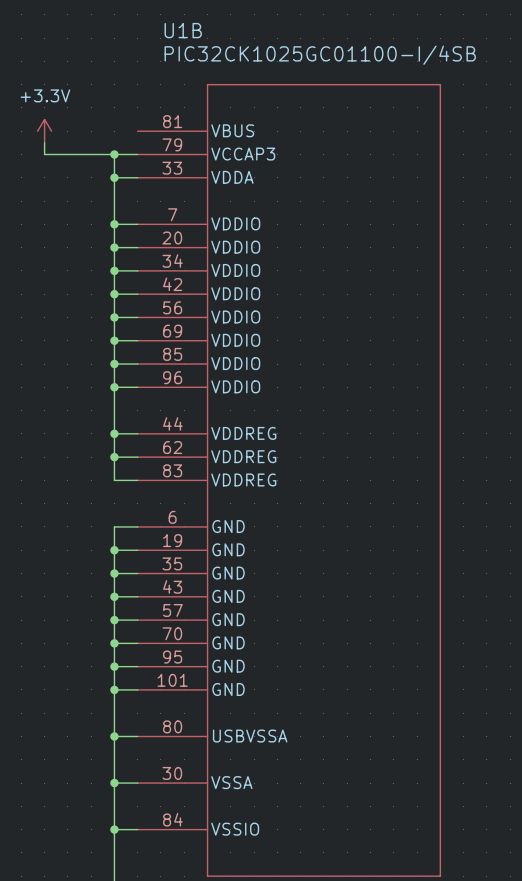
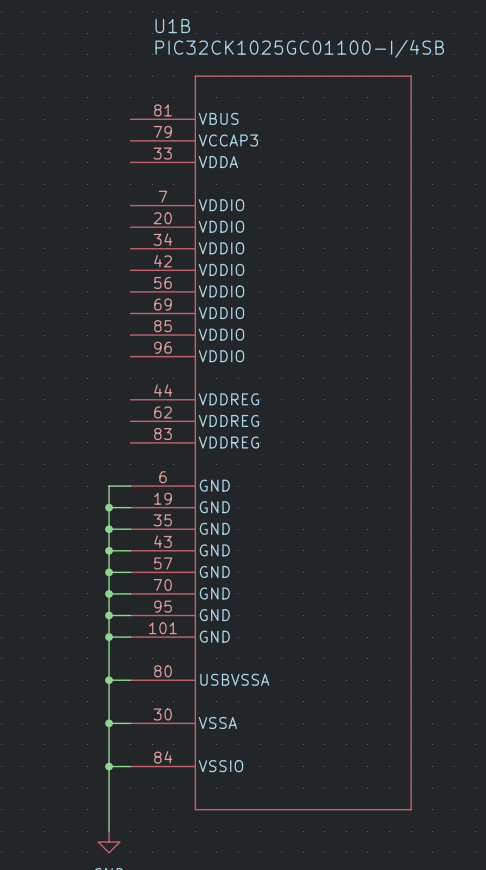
power symbol: +3.3V (44, 131) -> none
wire: (44, 142) (44, 154) (137, 154) -> none
wire: (114, 154) (114, 480) (137, 480) -> none
junction: (114, 154) -> none
wire: (114, 177) (137, 177) -> none
junction: (114, 177) -> none
wire: (114, 224) (137, 224) -> none
junction: (114, 224) -> none
wire: (114, 247) (137, 247) -> none
junction: (114, 247) -> none
wire: (114, 270) (137, 270) -> none
junction: (114, 270) -> none
wire: (114, 294) (137, 294) -> none
junction: (114, 294) -> none
wire: (114, 317) (137, 317) -> none
junction: (114, 317) -> none
wire: (114, 340) (137, 340) -> none
junction: (114, 340) -> none
wire: (114, 364) (137, 364) -> none
junction: (114, 364) -> none
wire: (114, 387) (137, 387) -> none
junction: (114, 387) -> none
wire: (114, 433) (137, 433) -> none
junction: (114, 433) -> none
wire: (114, 457) (137, 457) -> none
junction: (114, 457) -> none

